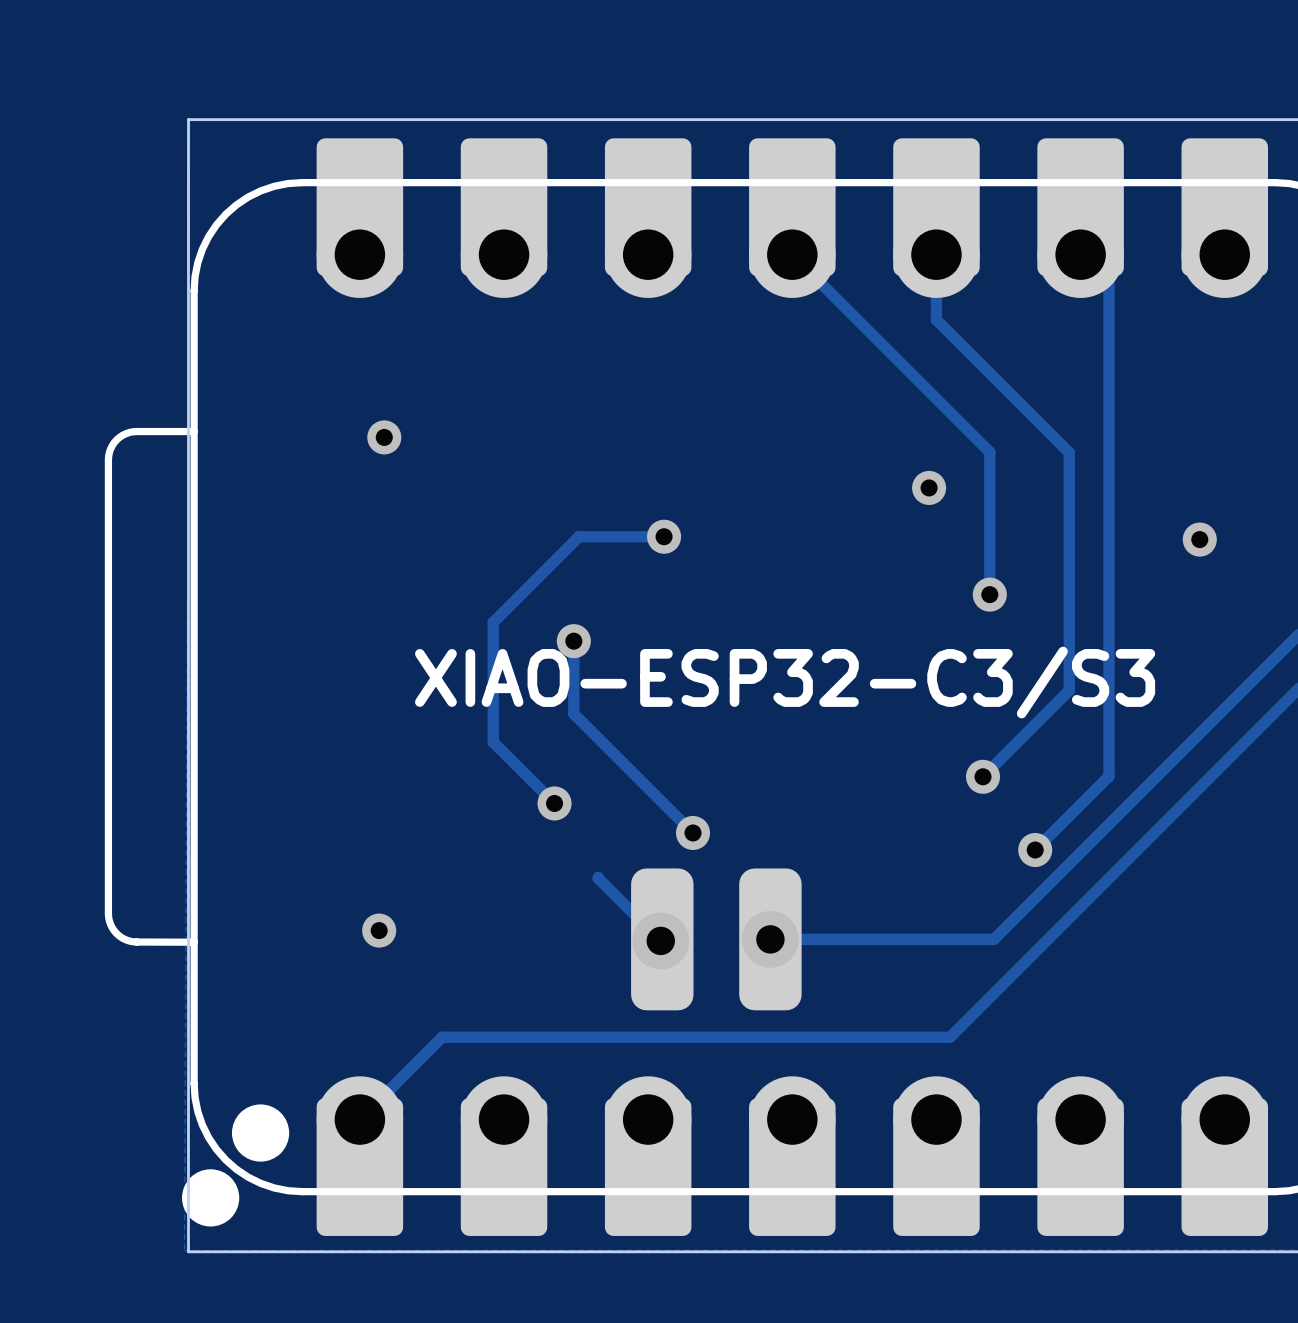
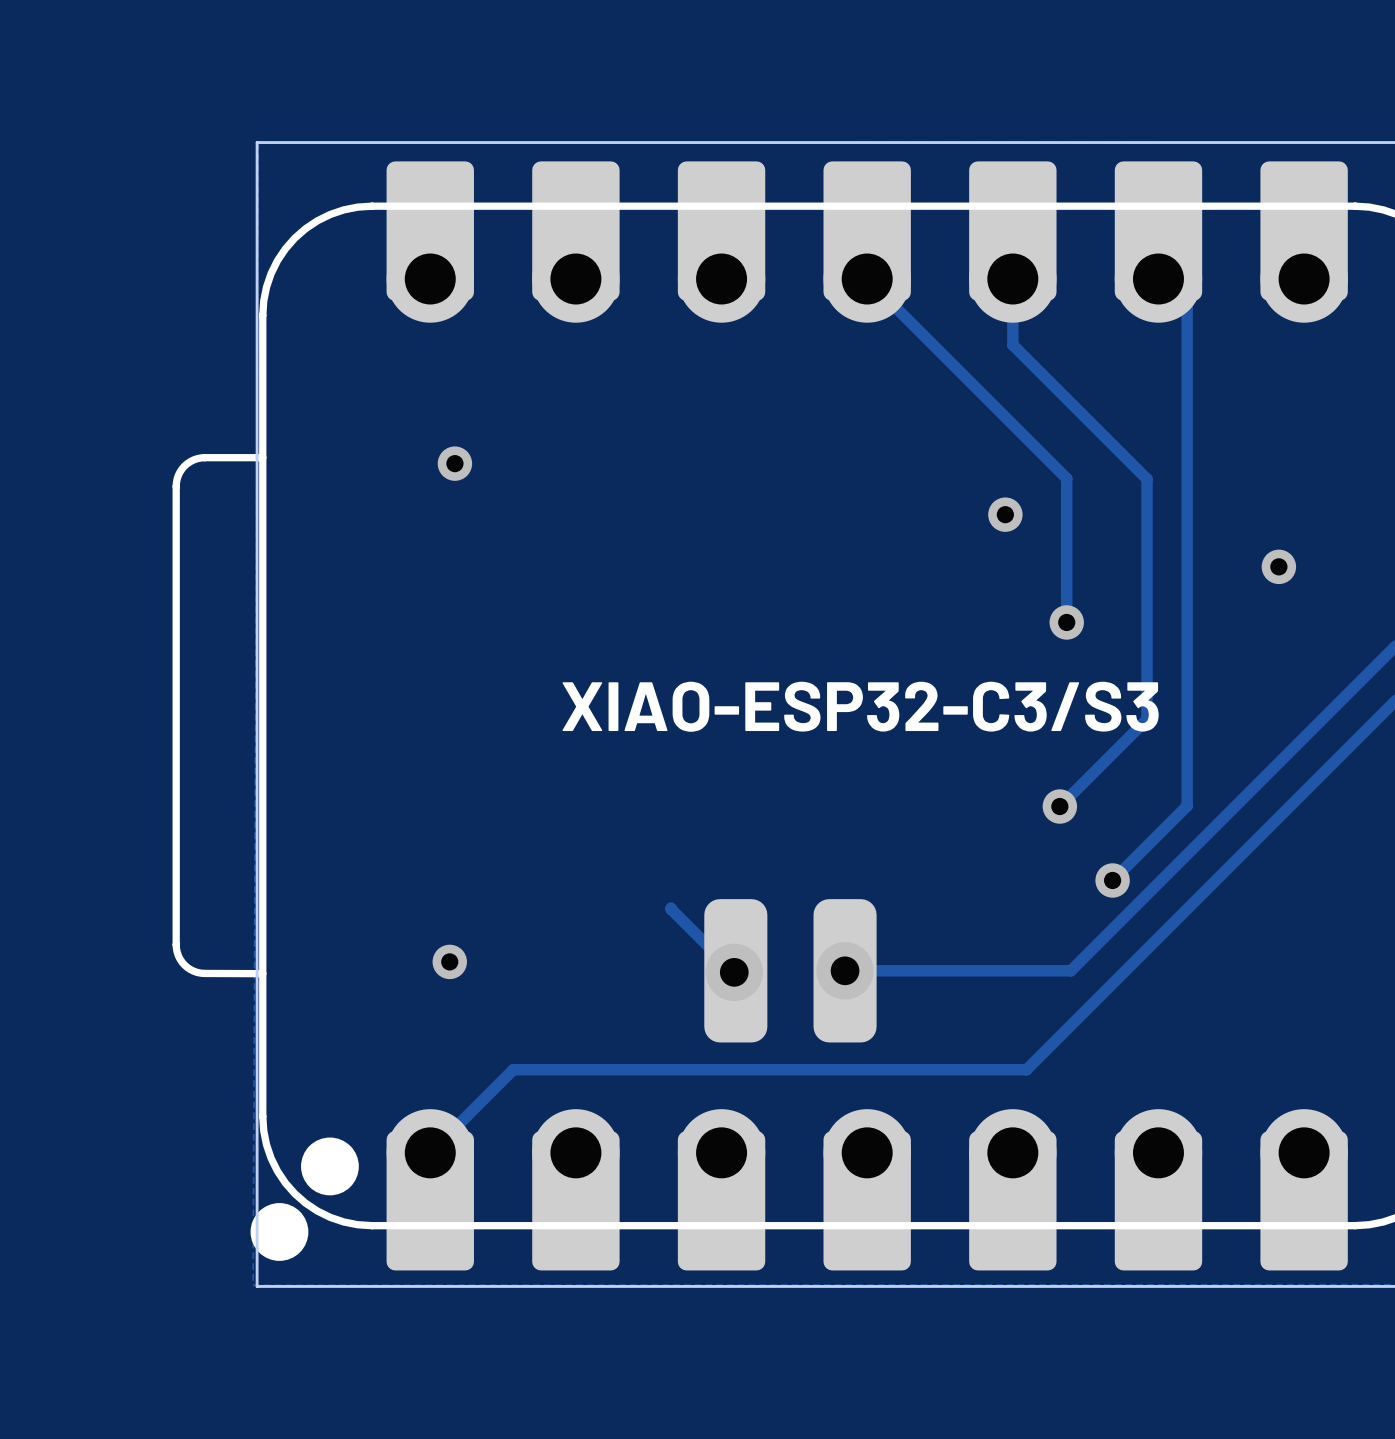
track: (664, 536) (578, 536) (493, 622) (493, 742) (554, 803) -> none
via: (664, 536) -> none
track: (573, 641) (573, 713) (693, 832) -> none
via: (573, 641) -> none
via: (554, 803) -> none
via: (693, 832) -> none

